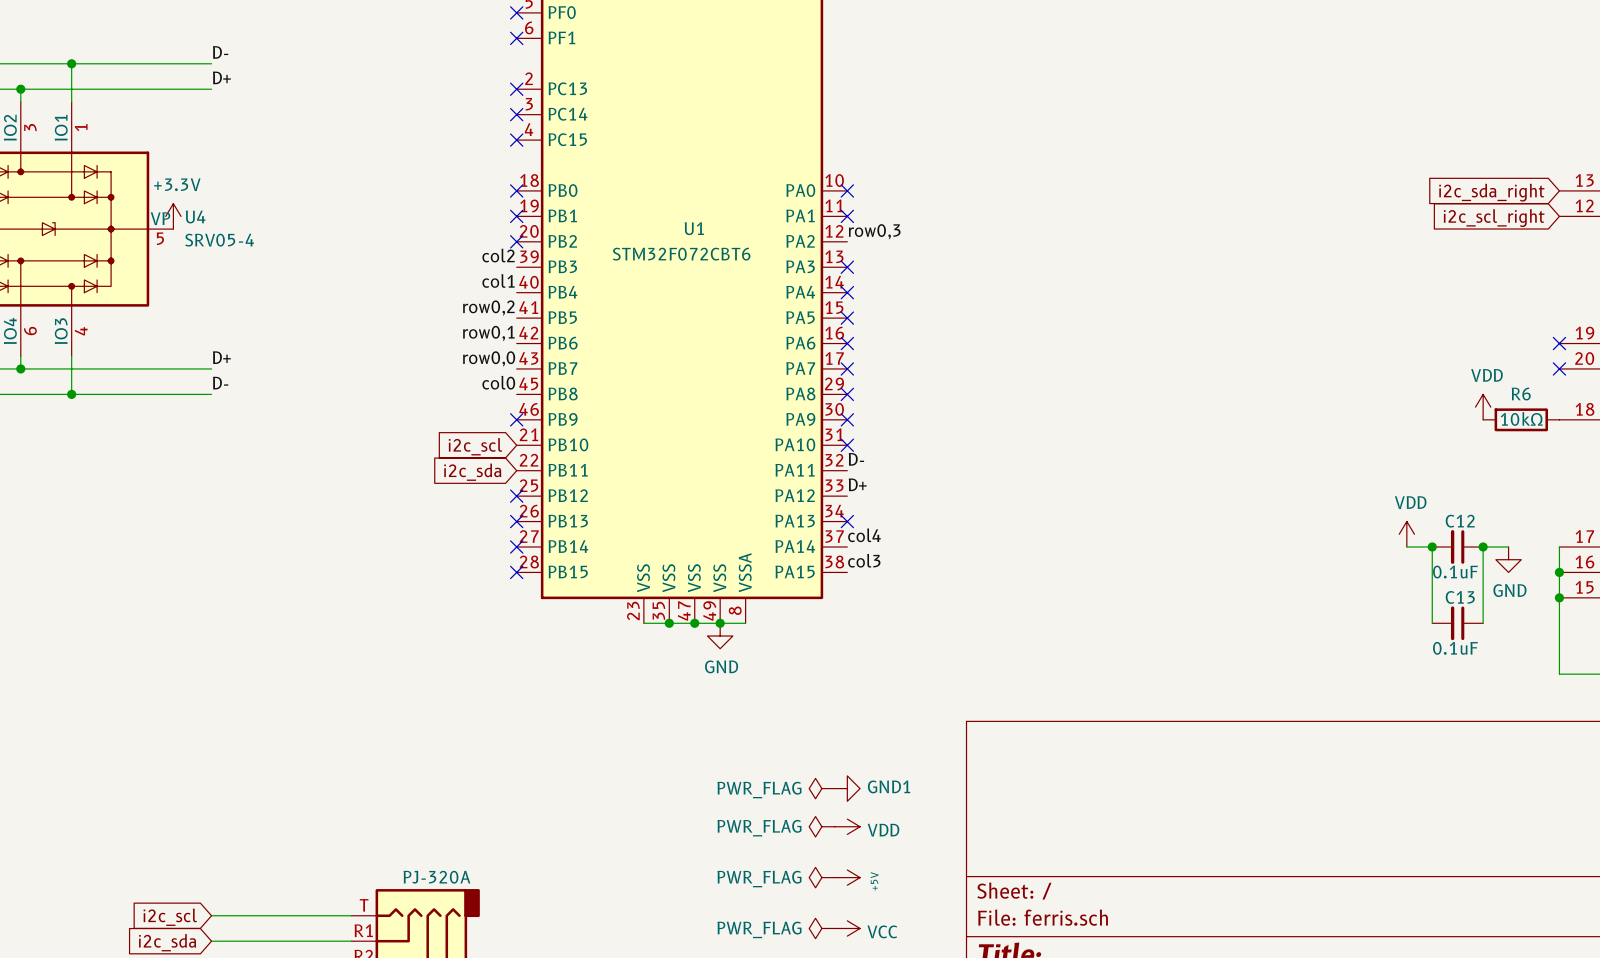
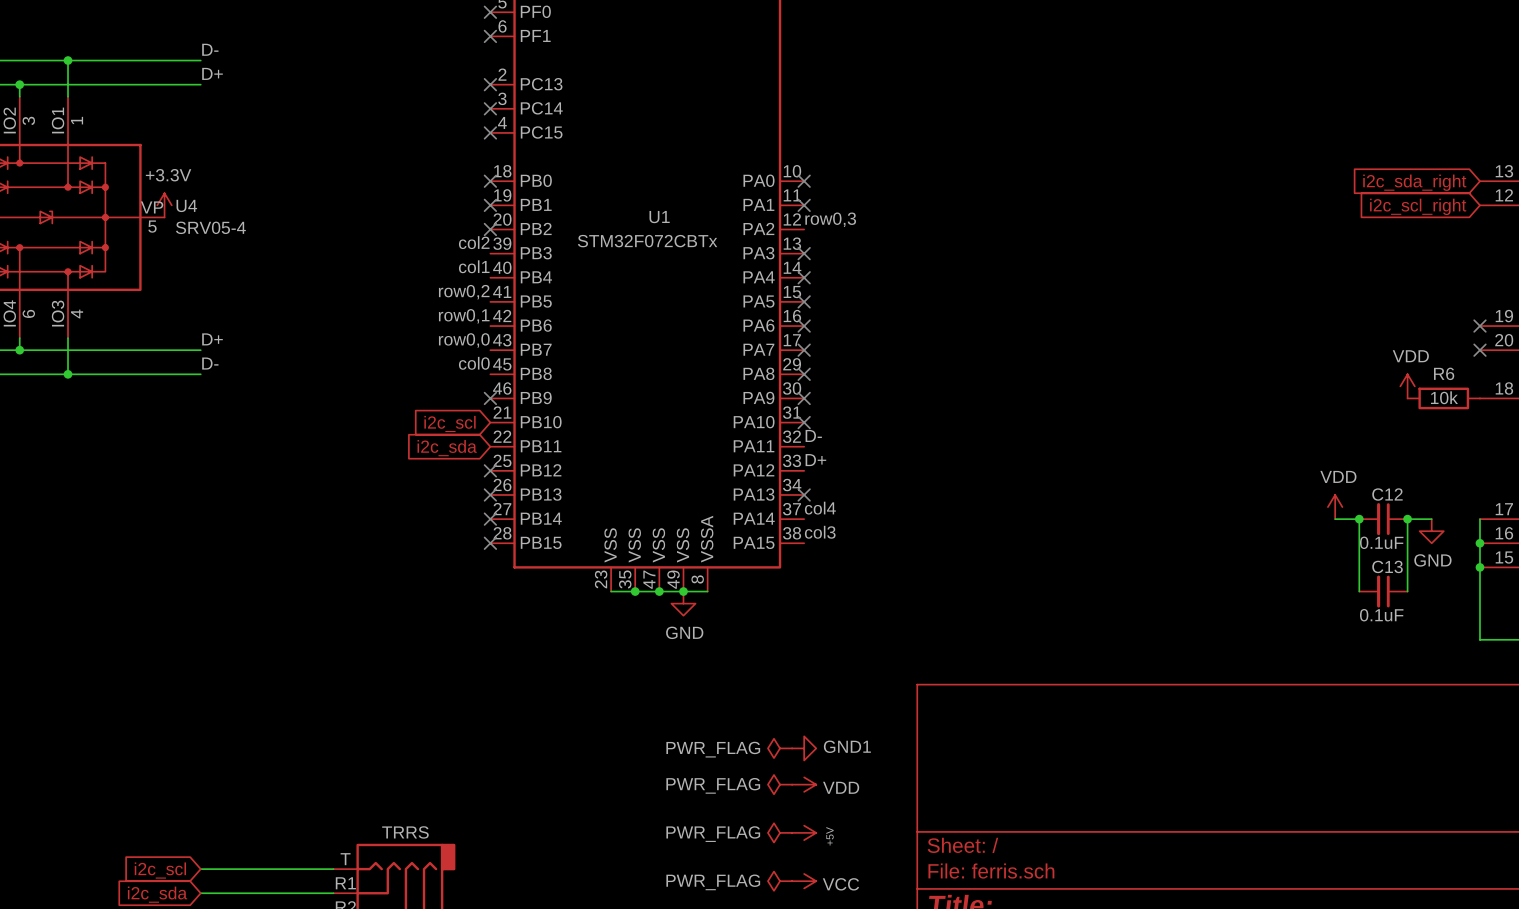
U1 value: STM32F072CBT6 (681, 254) -> STM32F072CBTx (647, 241)
R6 value: 10kΩ (1521, 419) -> 10k (1444, 397)
part value: PJ-320A (436, 877) -> TRRS (405, 832)

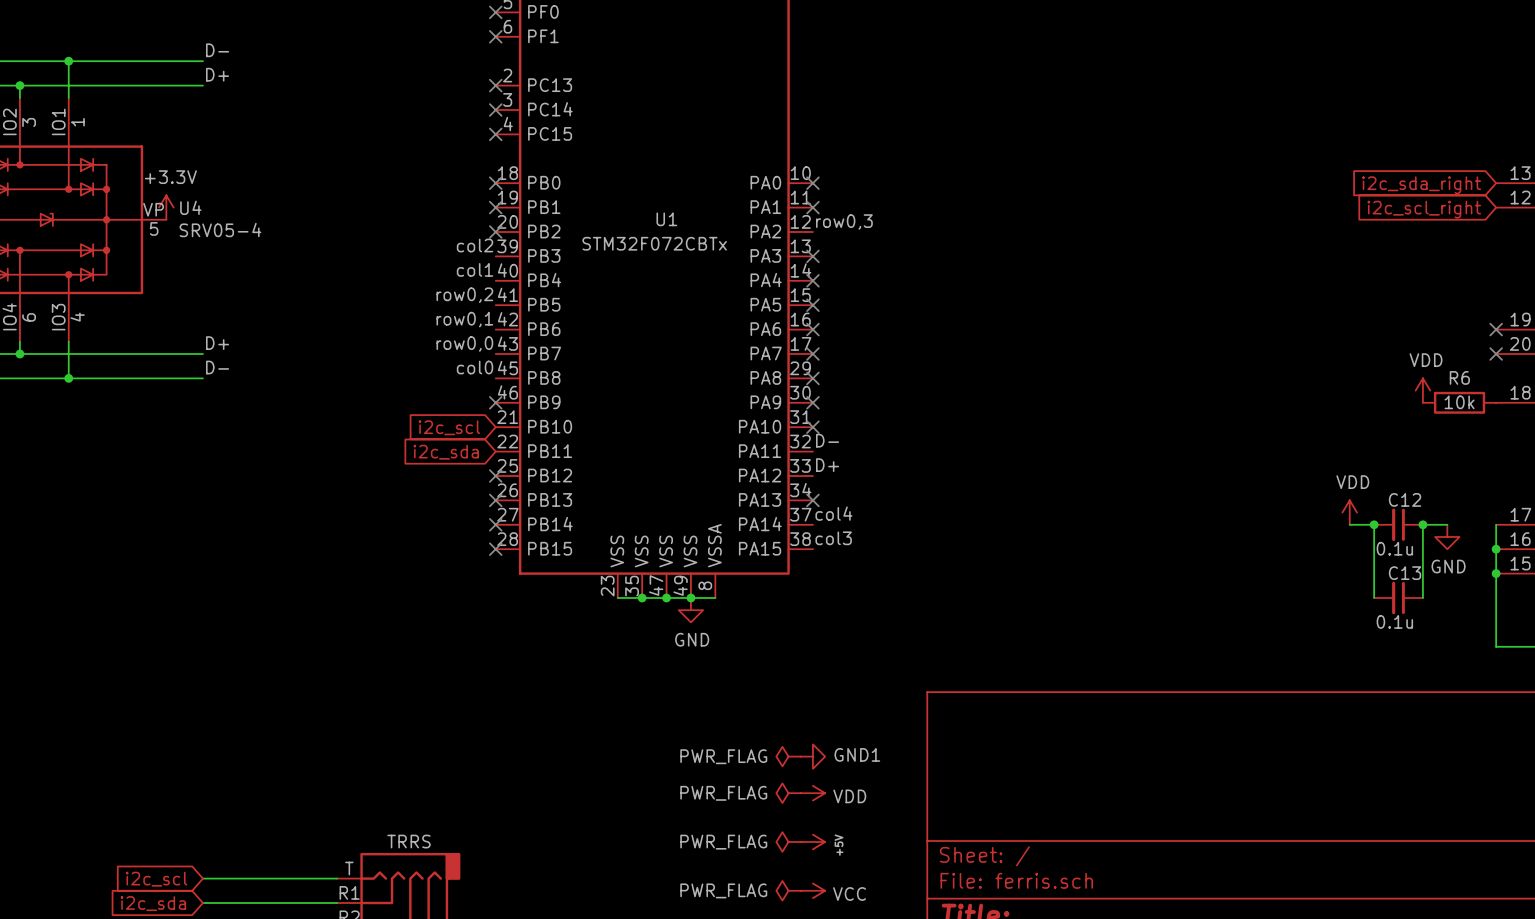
C12 value: 0.1uF (1381, 542) -> 0.1u (1394, 548)
C13 value: 0.1uF (1381, 615) -> 0.1u (1394, 621)

